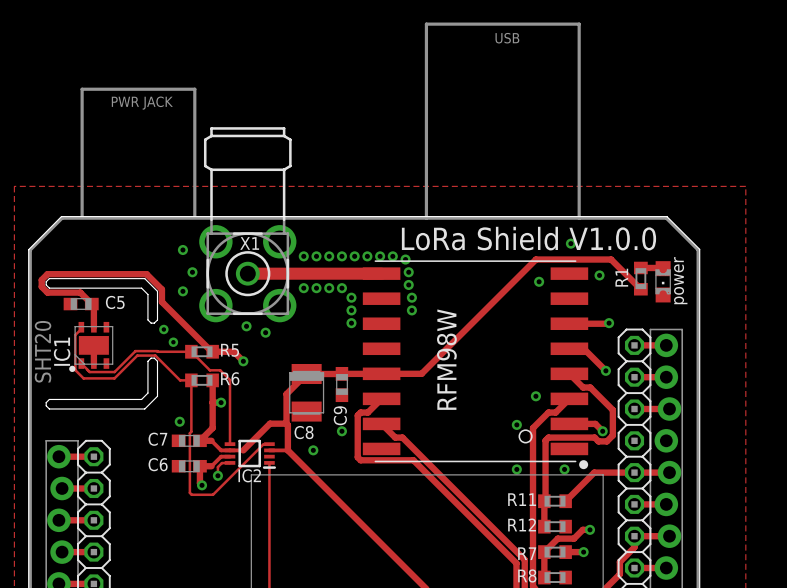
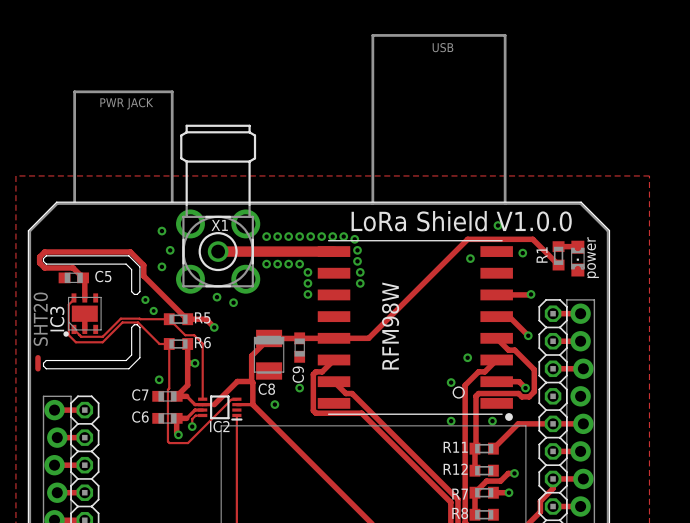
IC1 name: IC1 (62, 351) -> IC3 (57, 319)
track: none -> (37, 357) (37, 368)

